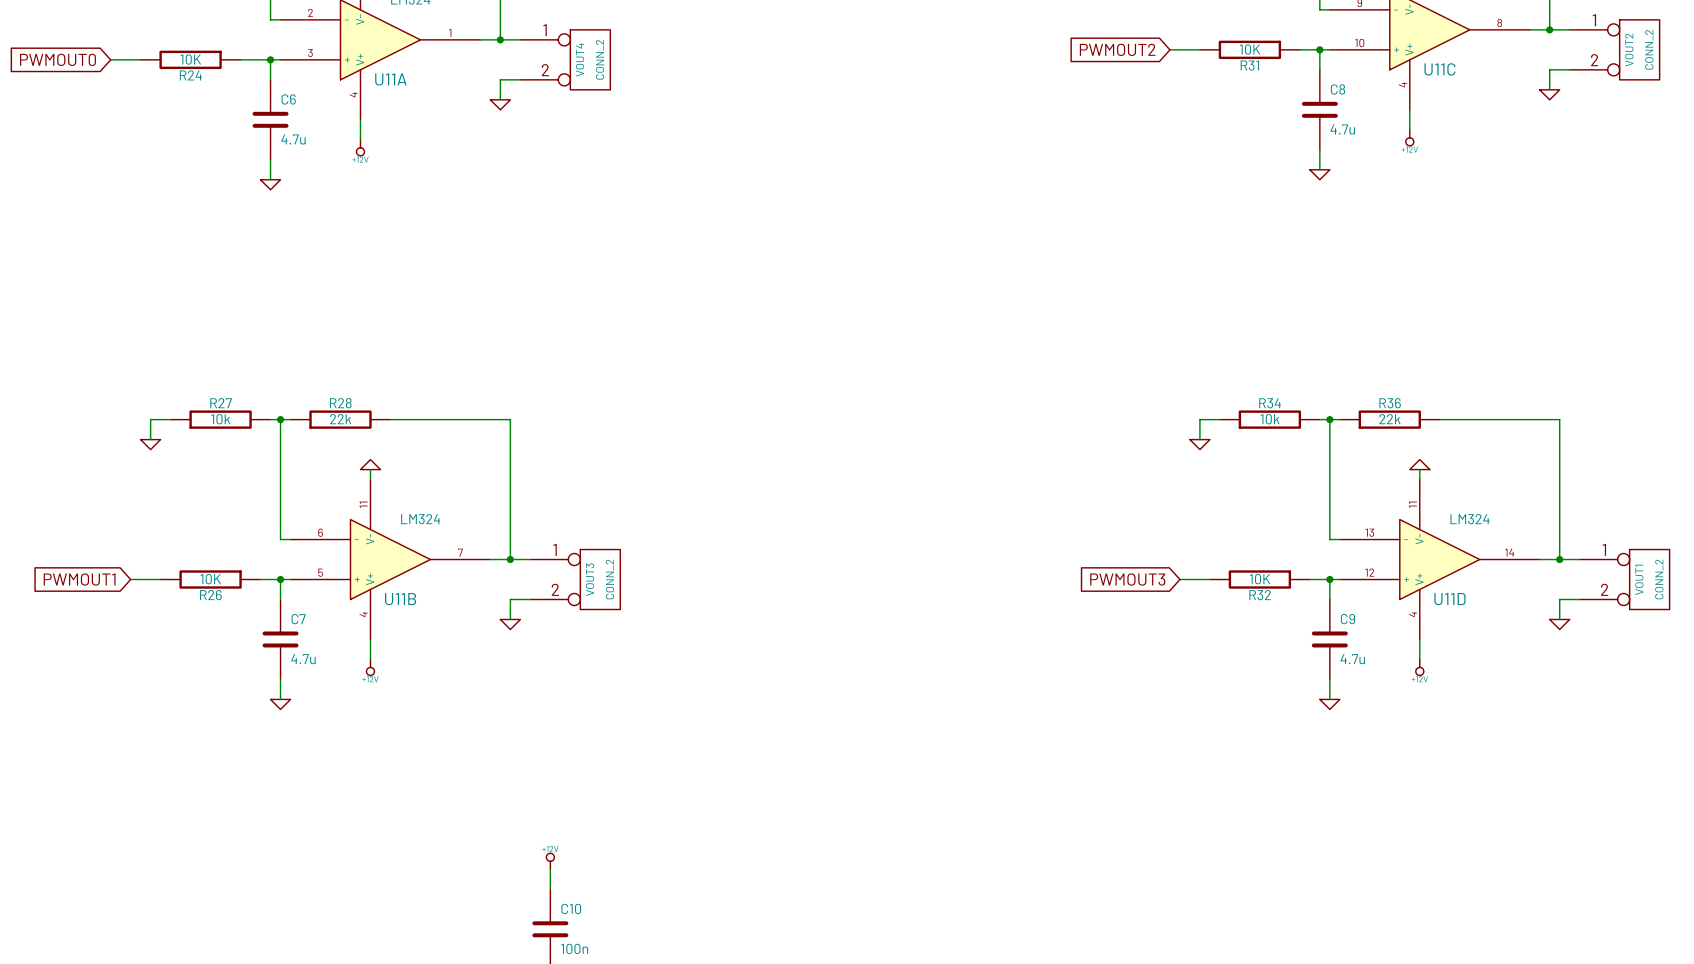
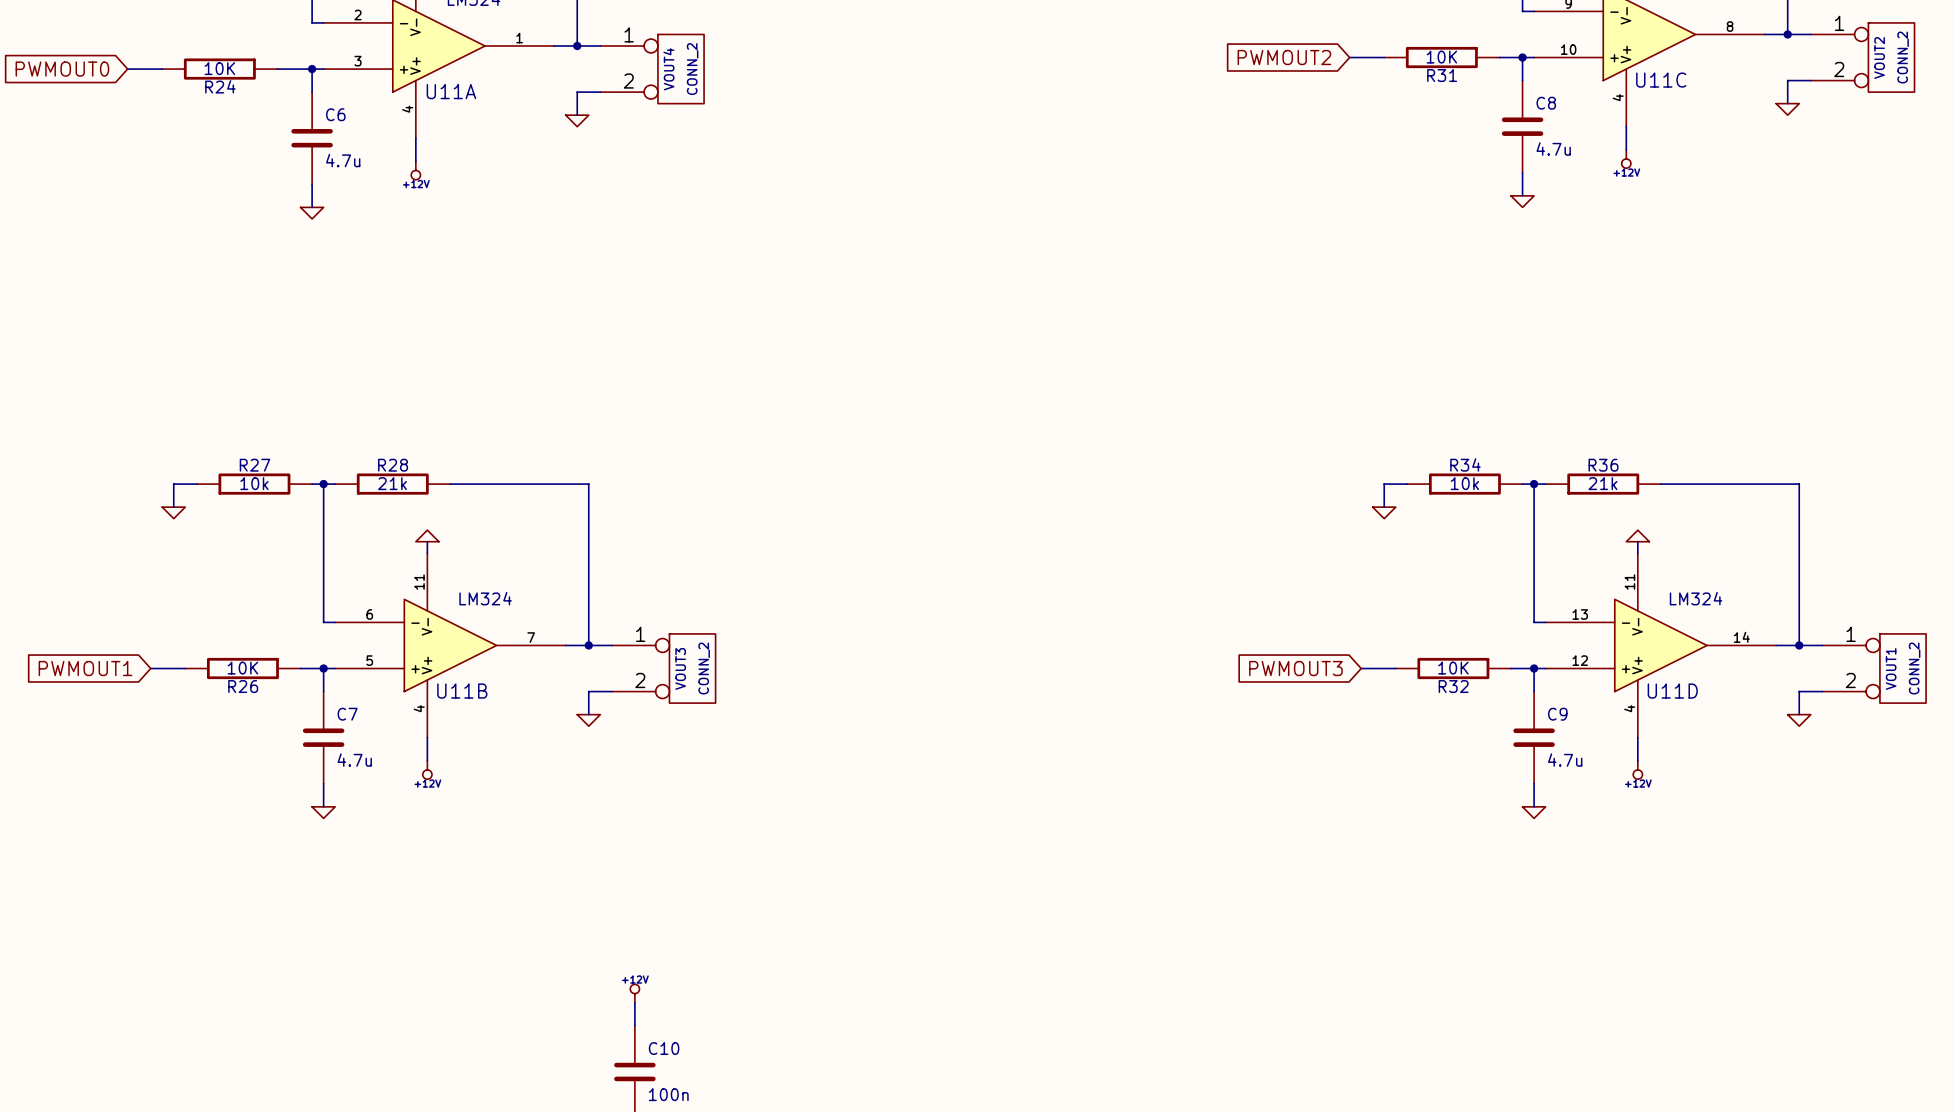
R28 value: 22k (340, 419) -> 21k (392, 483)
R36 value: 22k (1389, 419) -> 21k (1602, 483)

